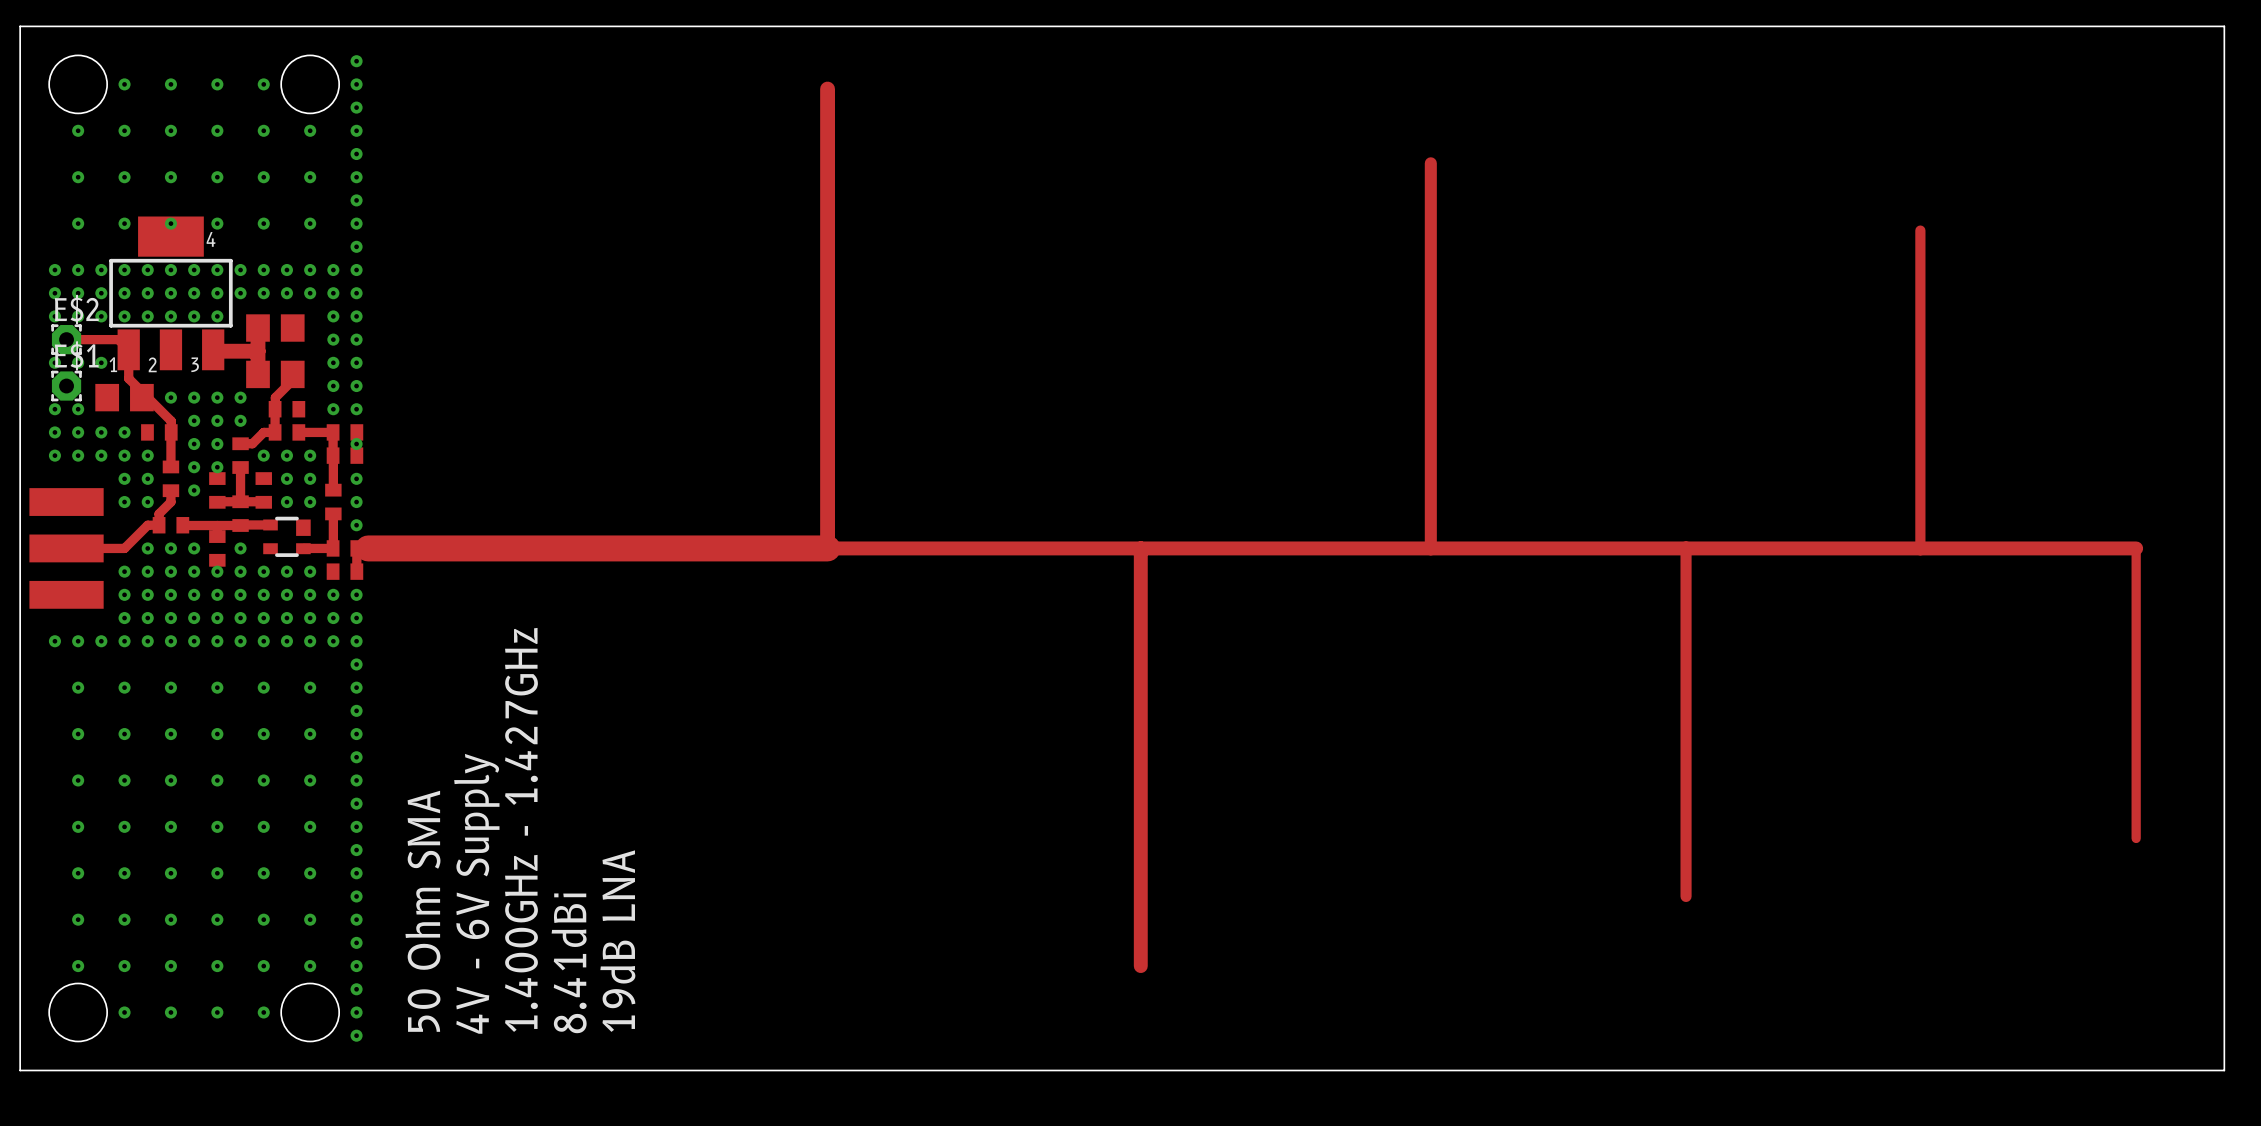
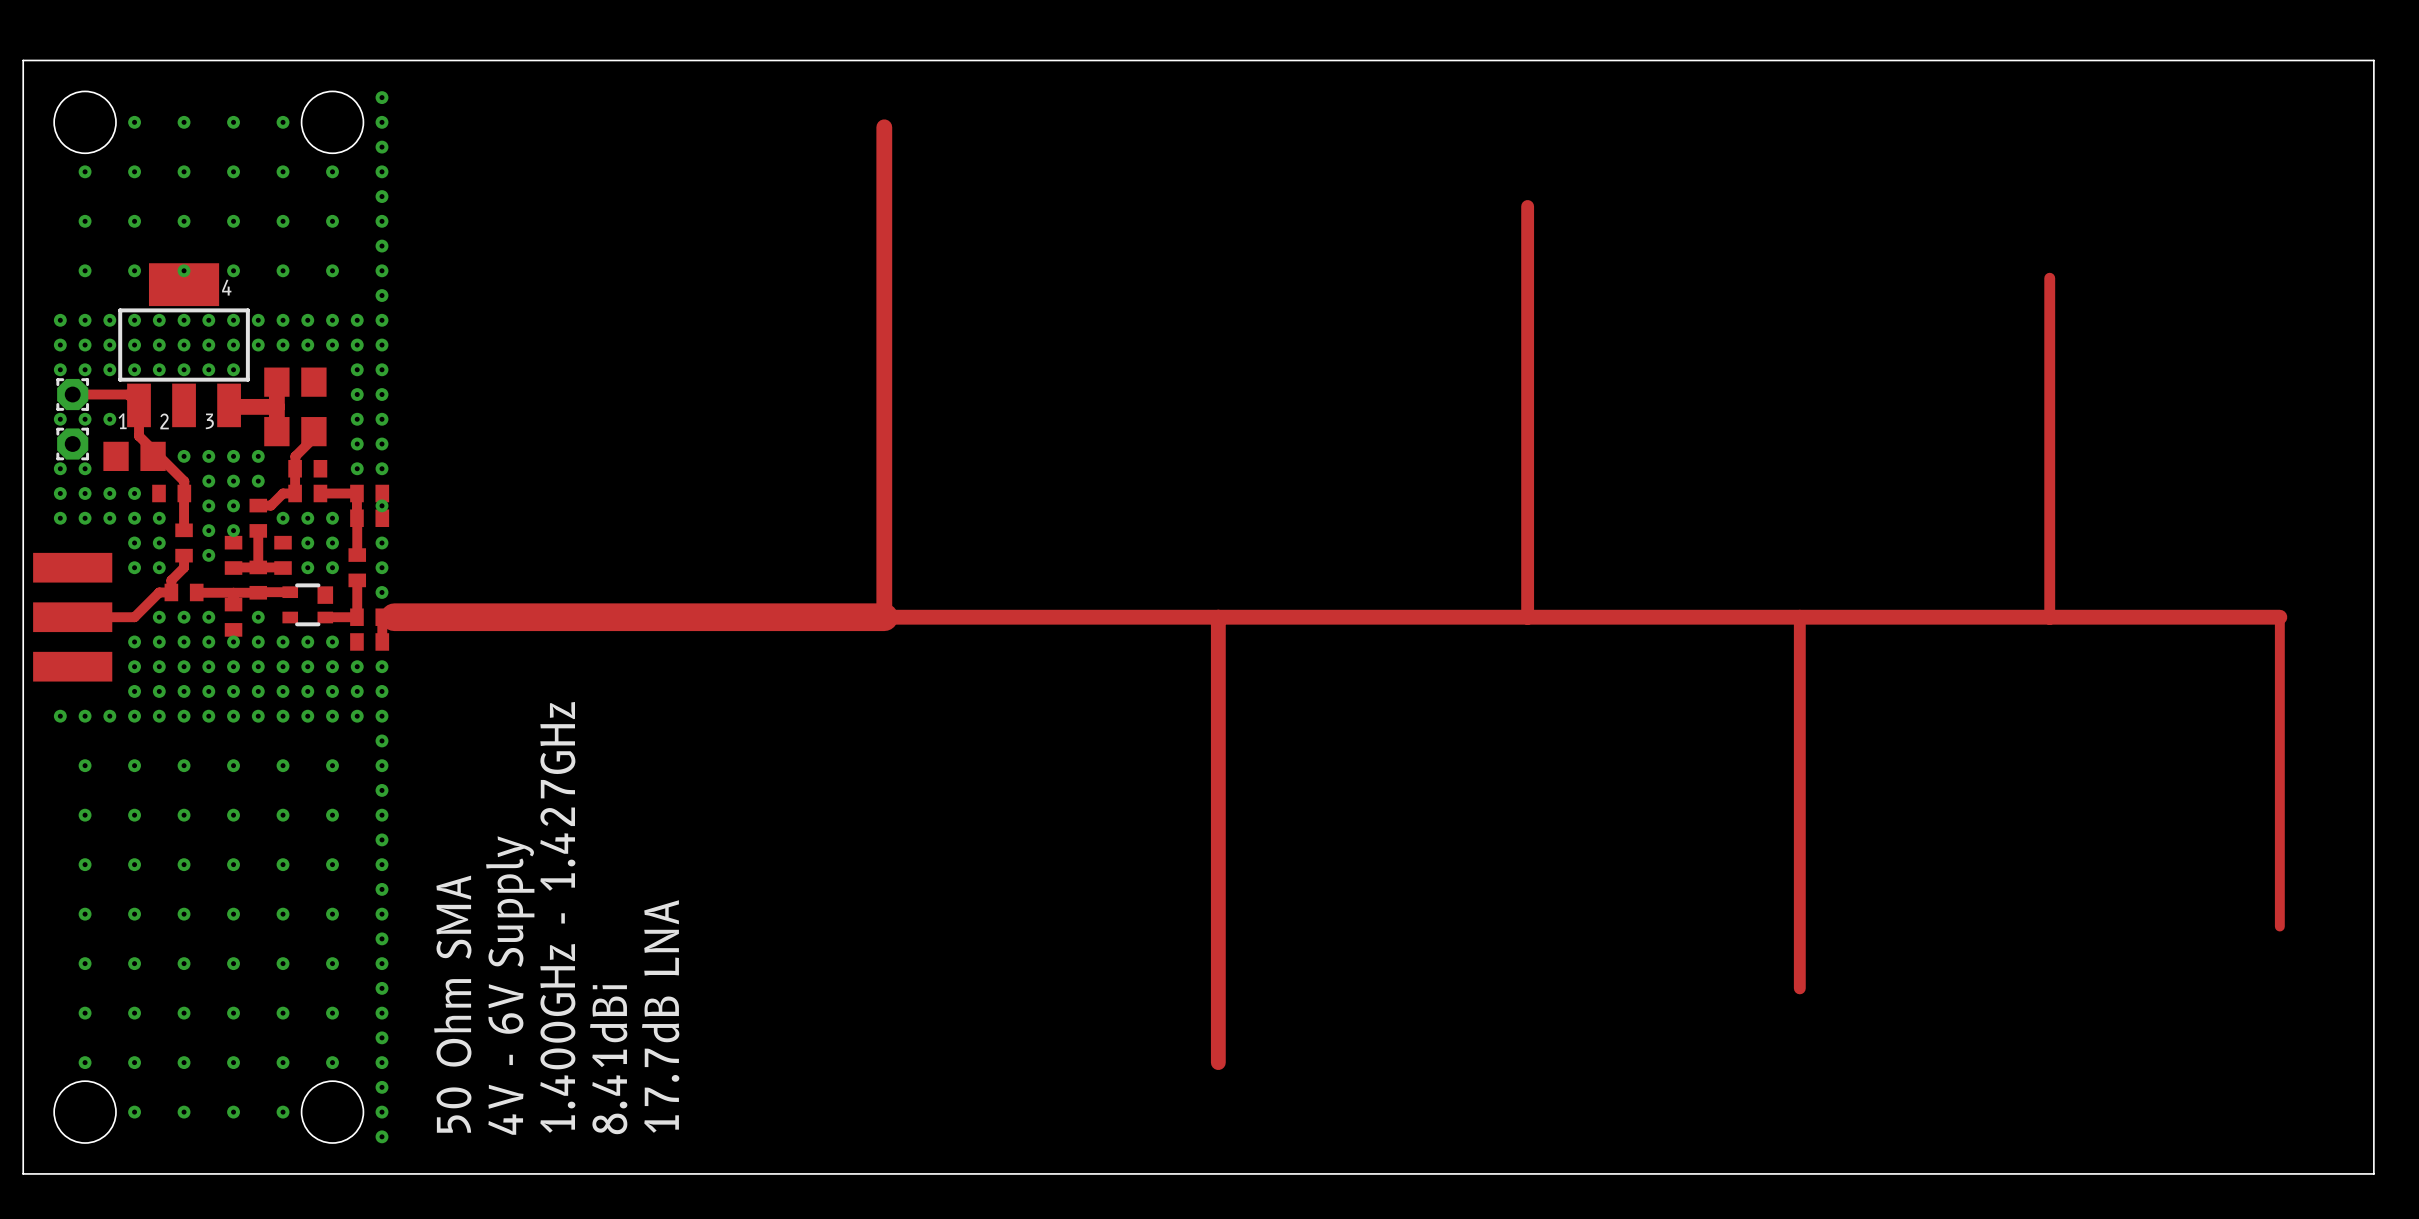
E$2 name: E$2 (76, 309) -> none
E$1 name: E$1 (76, 355) -> none
text: 19dB LNA (617, 941) -> 17.7dB LNA (660, 1016)

